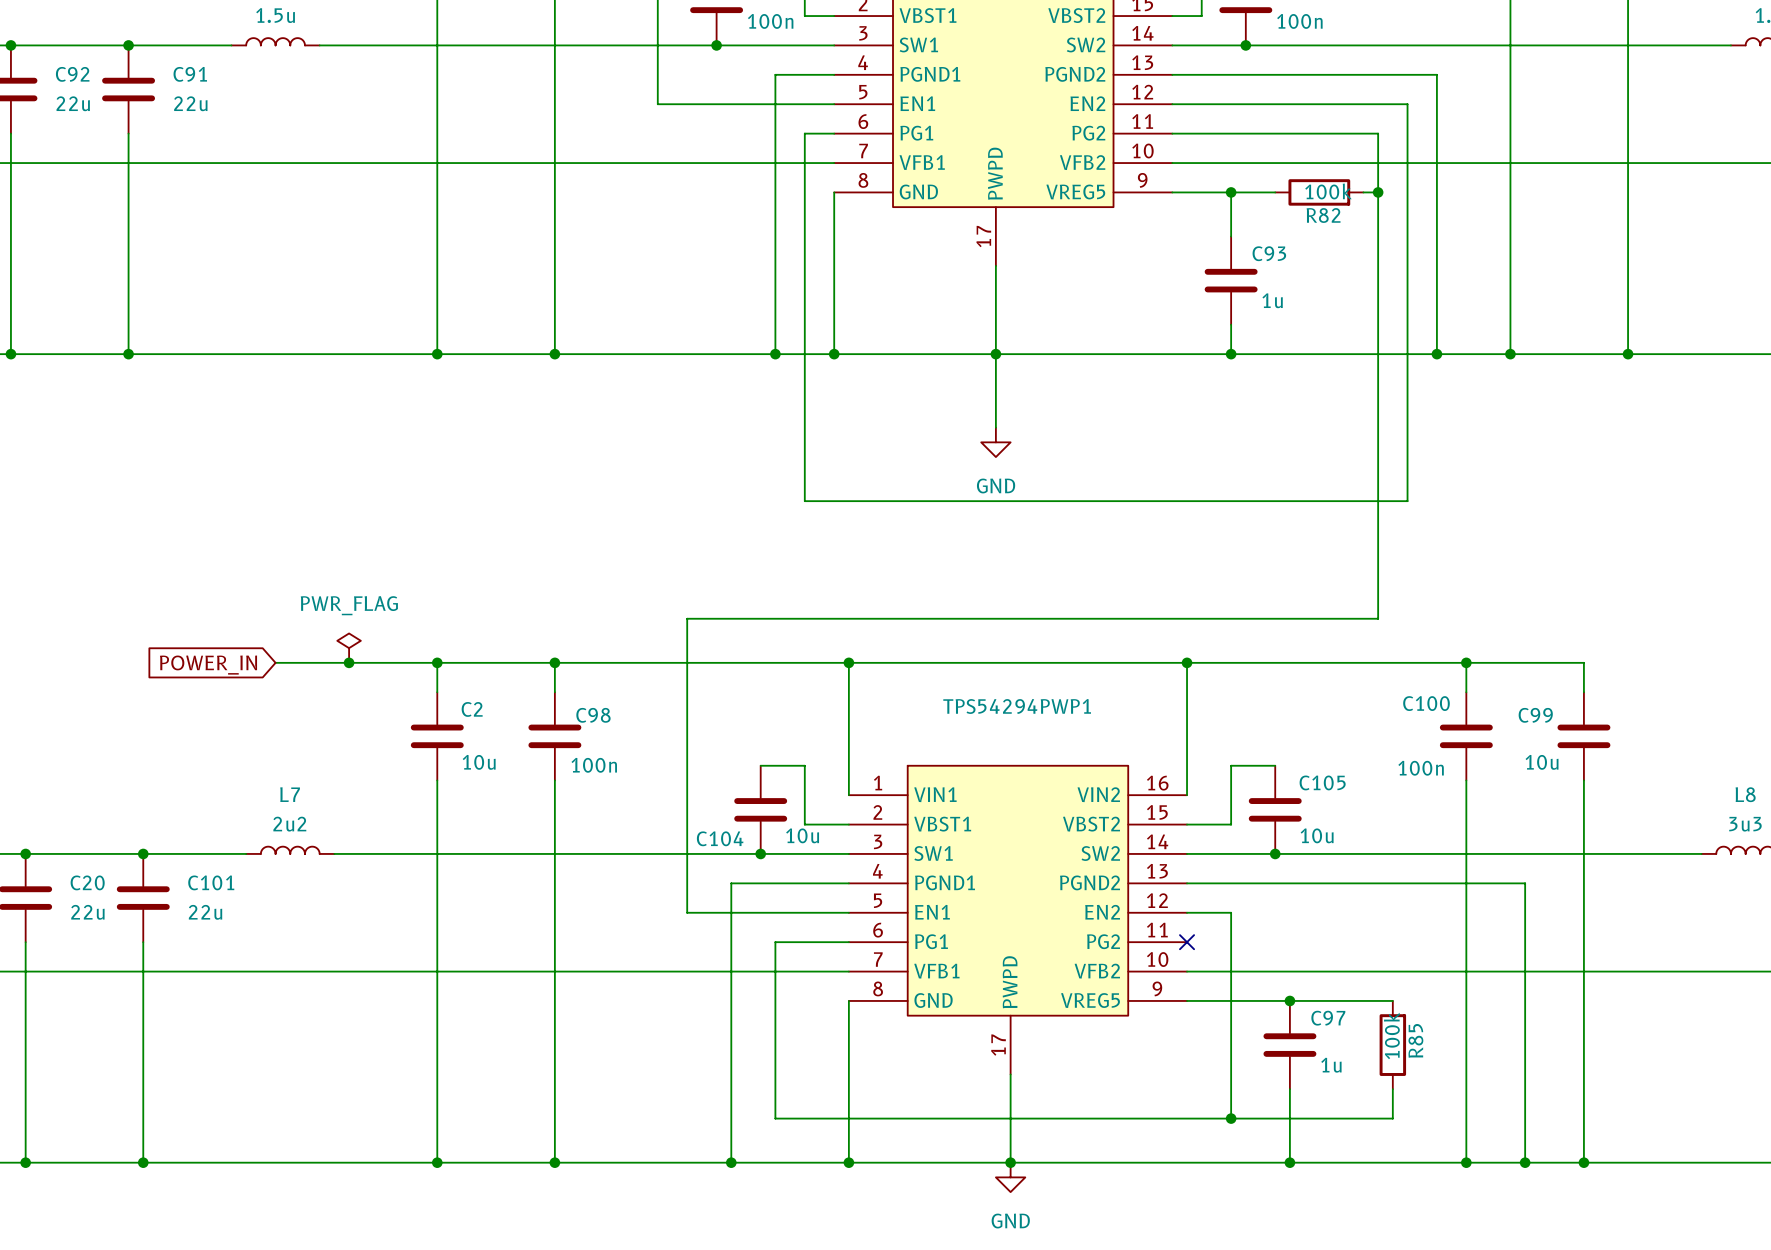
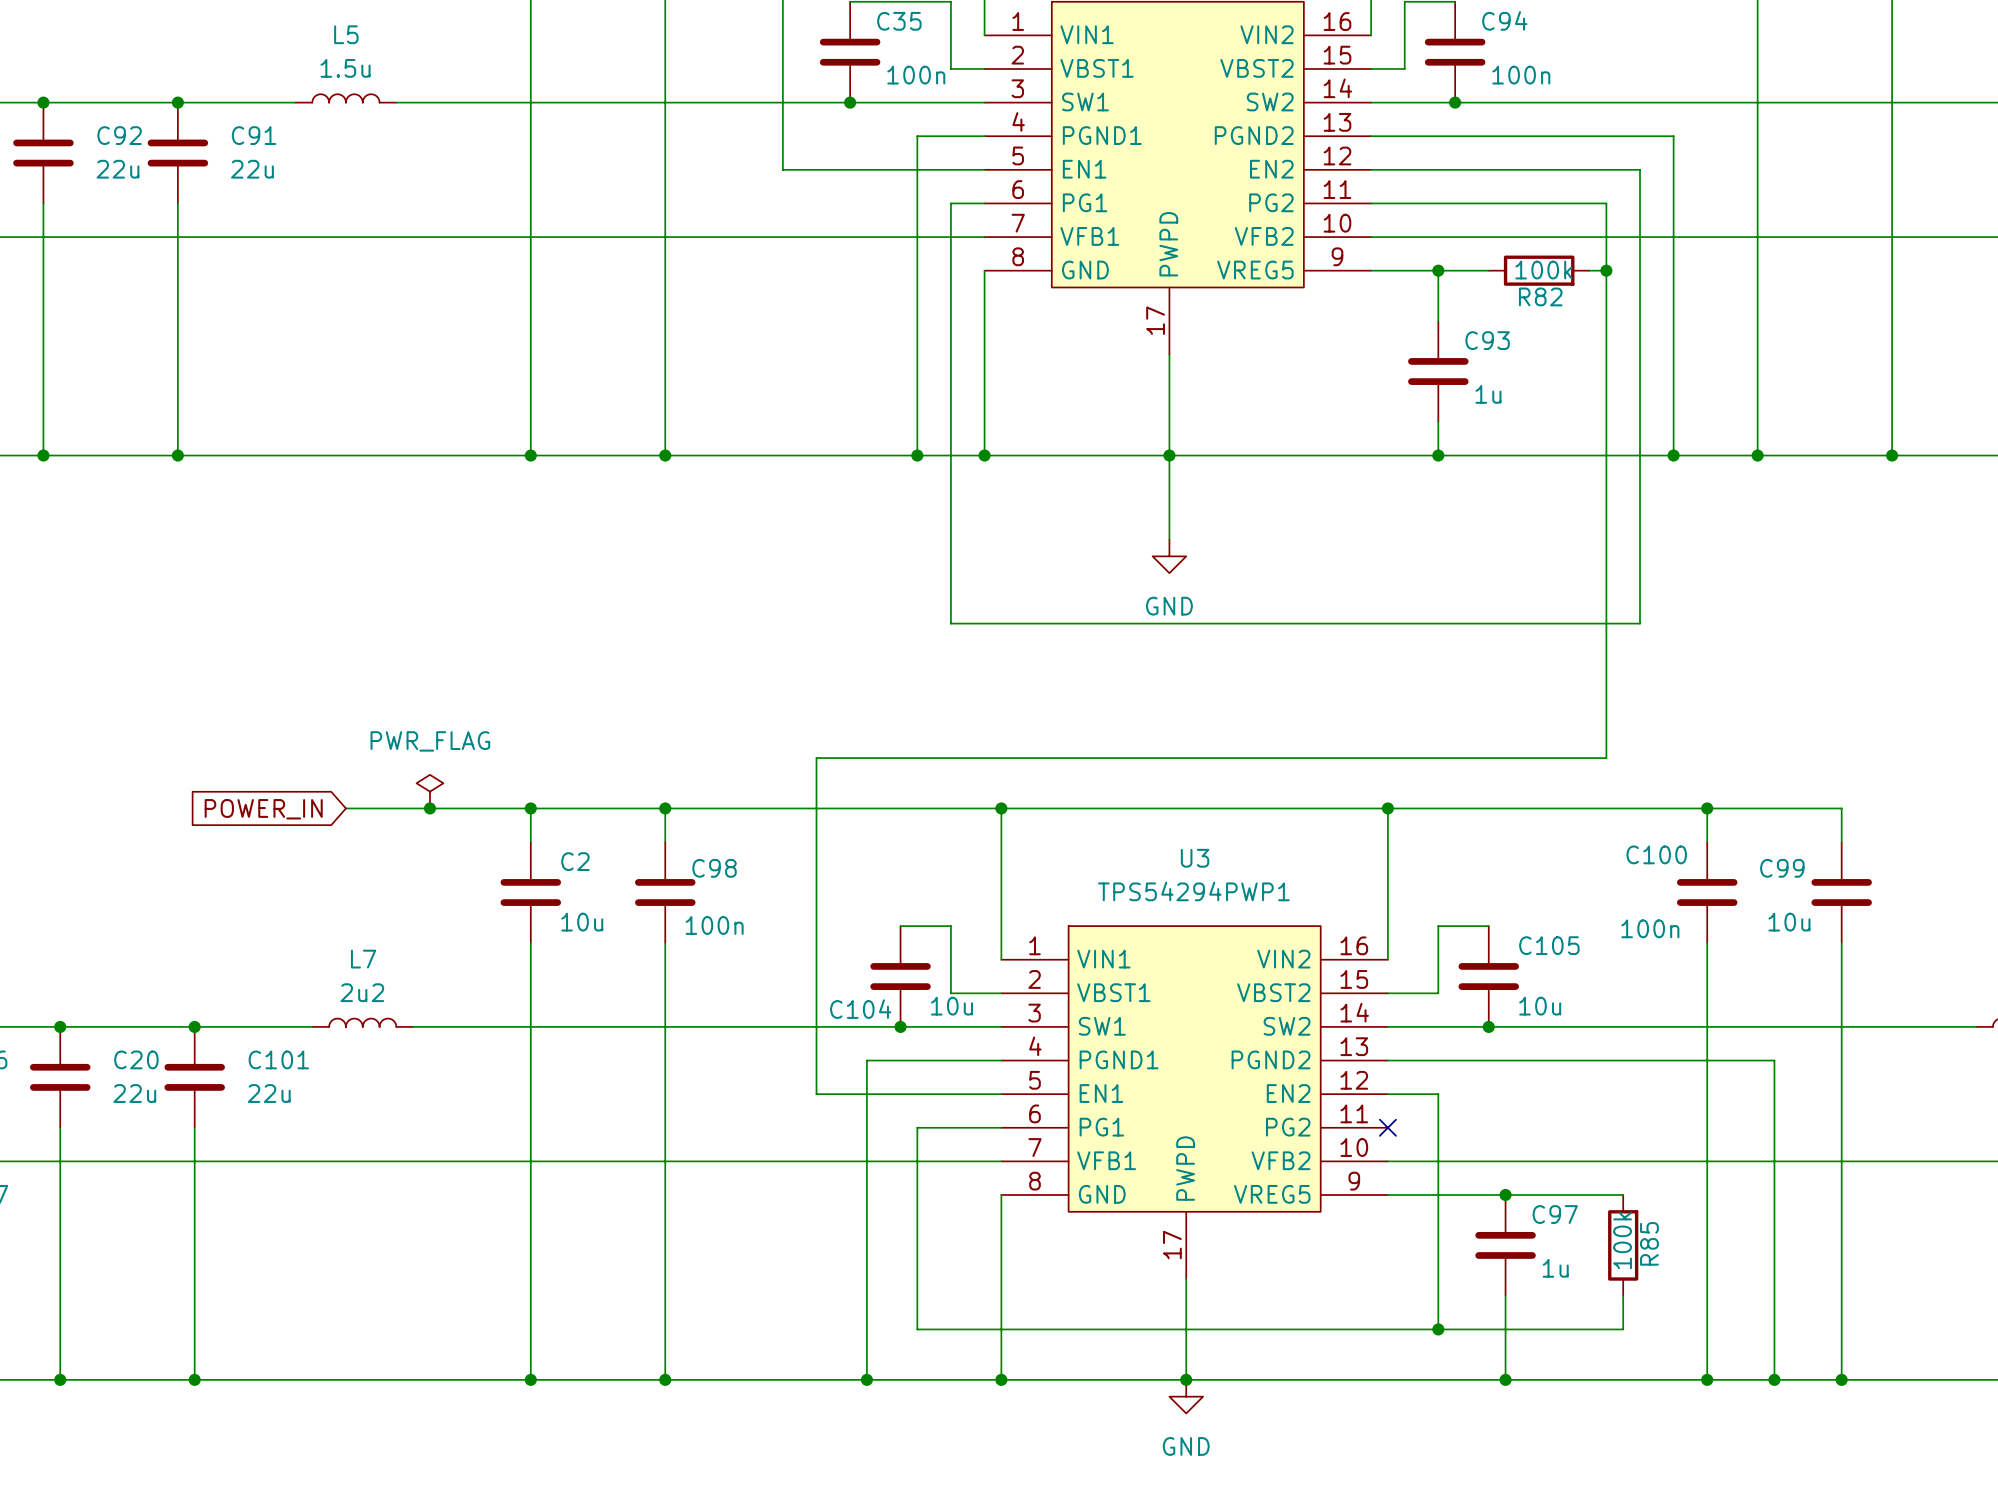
TPS54294PWP1 name: TPS54294PWP1 (1017, 706) -> U3 (1195, 858)
TPS54294PWP1 value: none -> TPS54294PWP1 (1193, 891)

